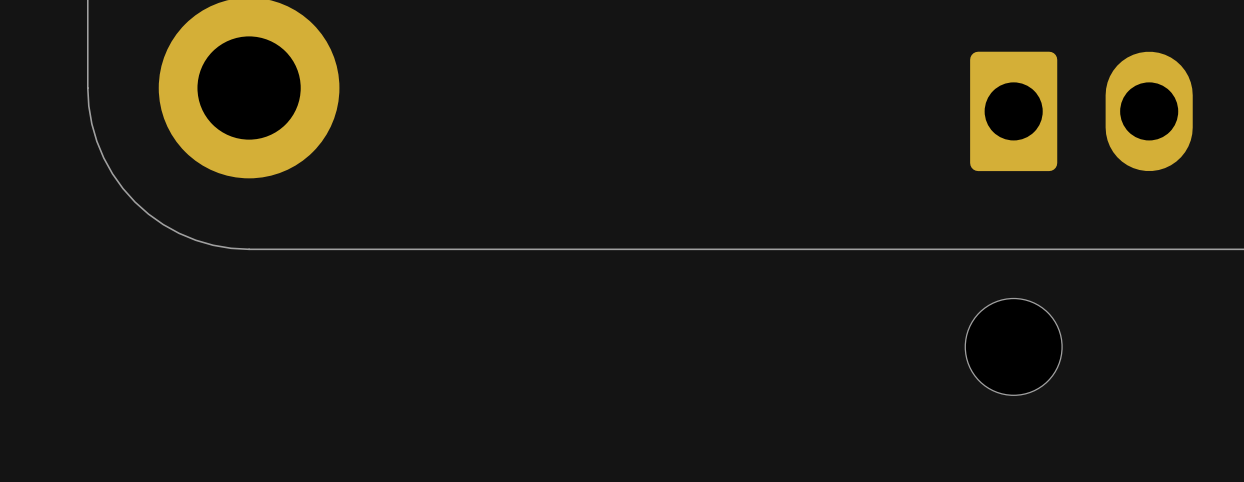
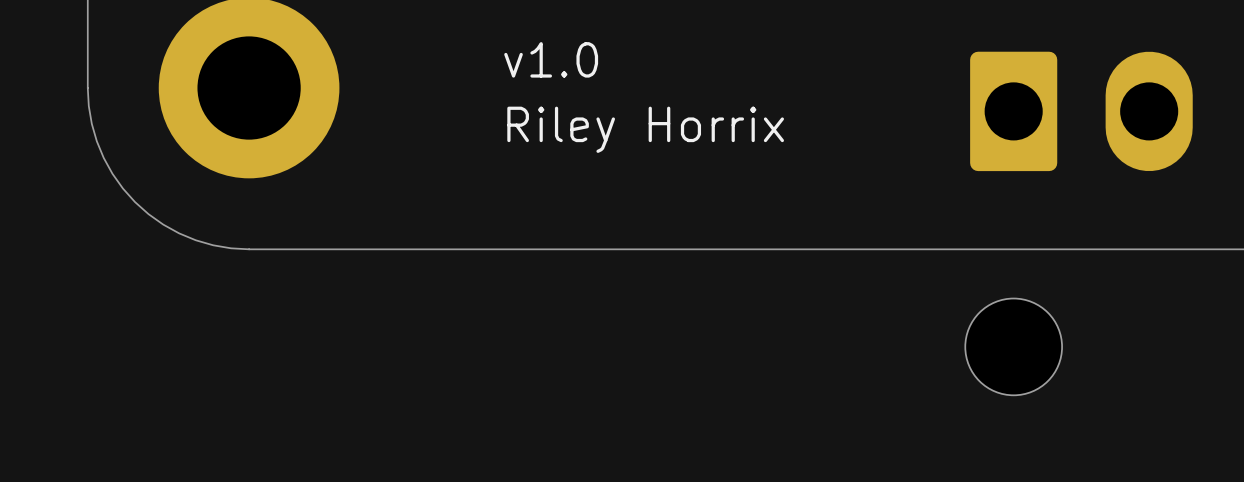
text: none -> v1.0 (551, 59)
text: none -> Riley Horrix (645, 129)

